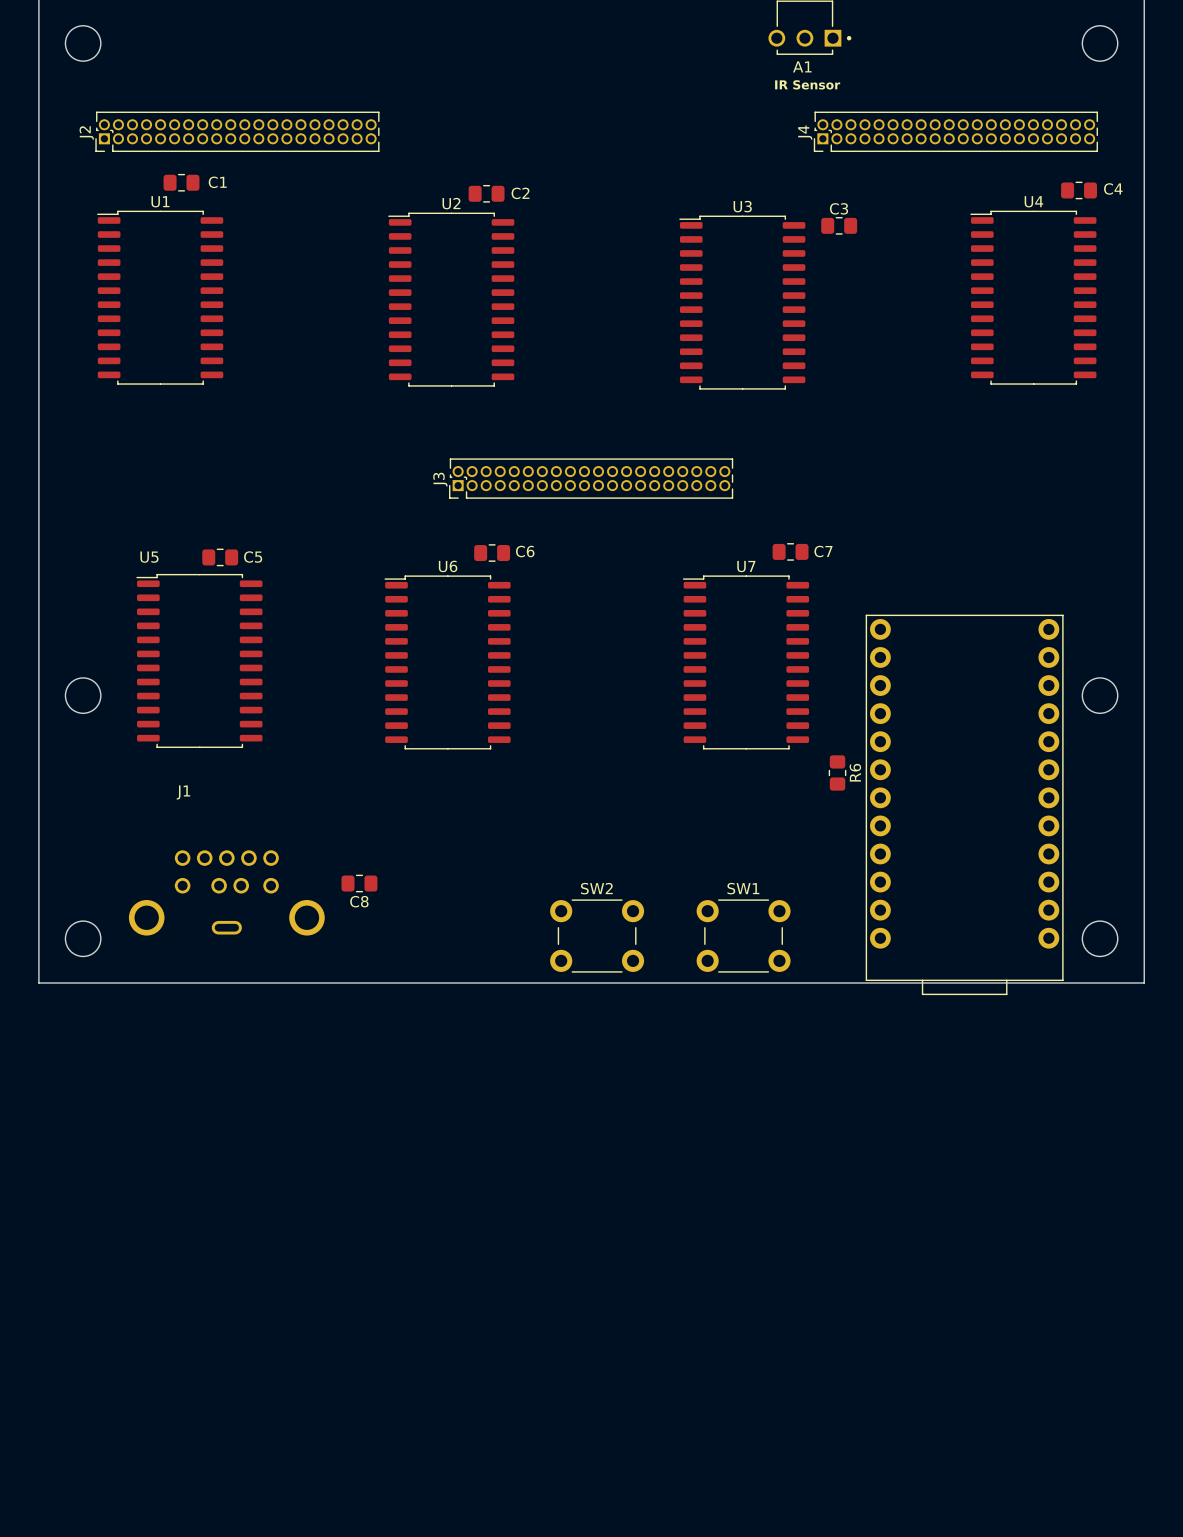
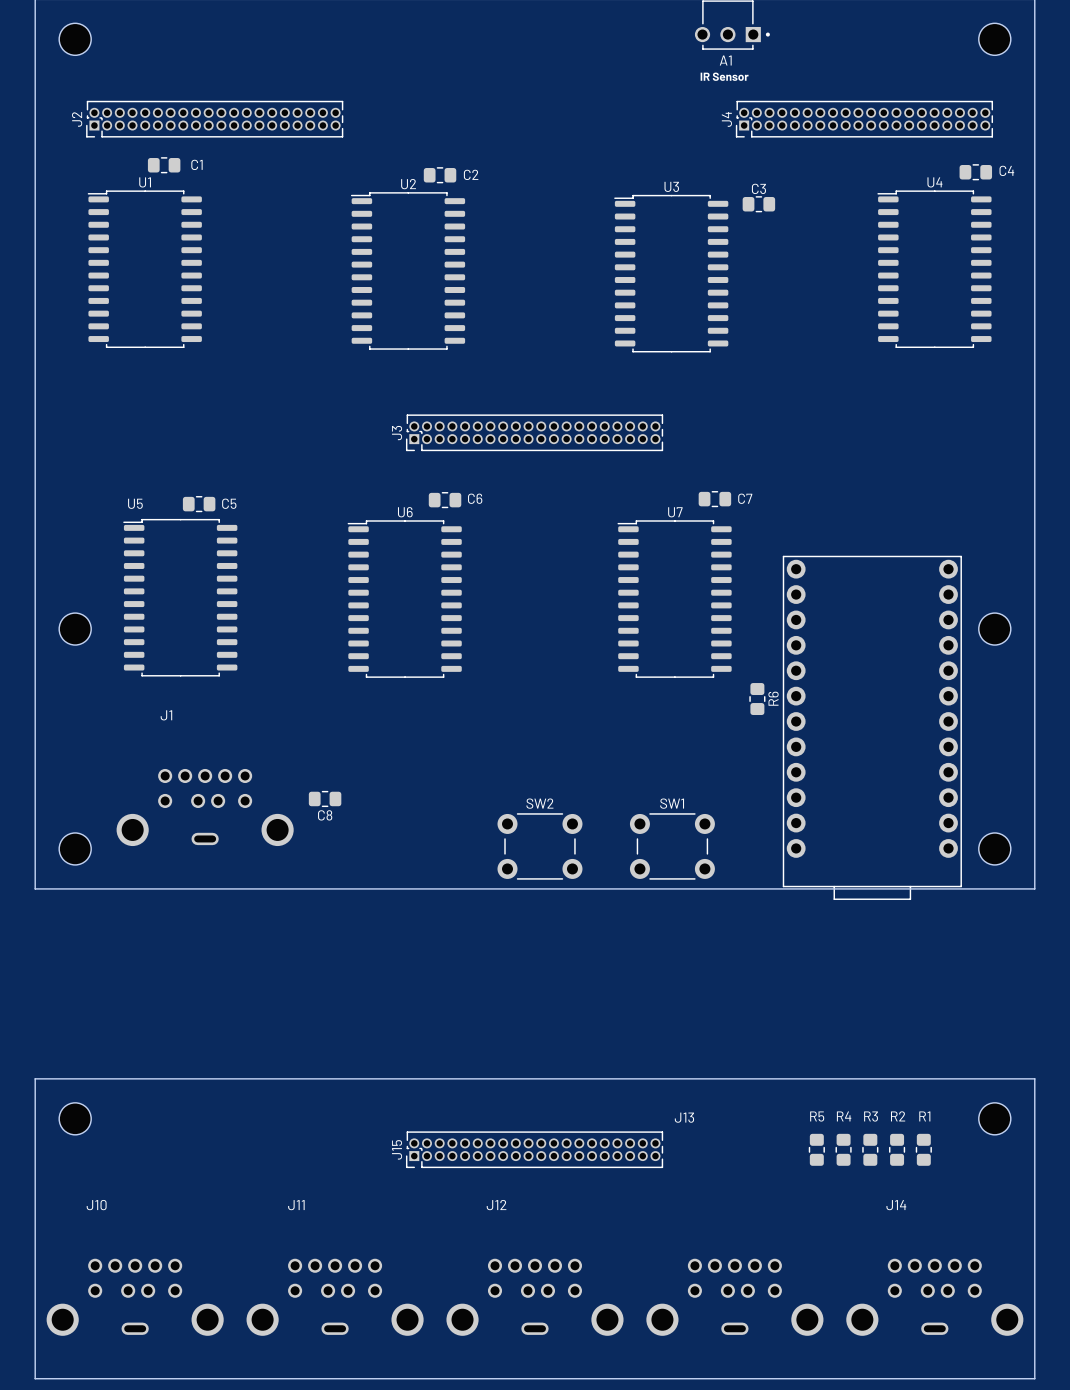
board edge: none -> (35, 1078) (35, 1378) (1034, 1378) (1034, 1078) (35, 1078)
part: none -> (75, 1118)
part: none -> (994, 1118)
J15: none -> (534, 1149)
R5: none -> (816, 1149)
R4: none -> (843, 1149)
R3: none -> (870, 1149)
R2: none -> (897, 1149)
R1: none -> (923, 1149)
J10: none -> (135, 1297)
J11: none -> (335, 1297)
J12: none -> (534, 1297)
J13: none -> (734, 1297)
J14: none -> (934, 1297)

